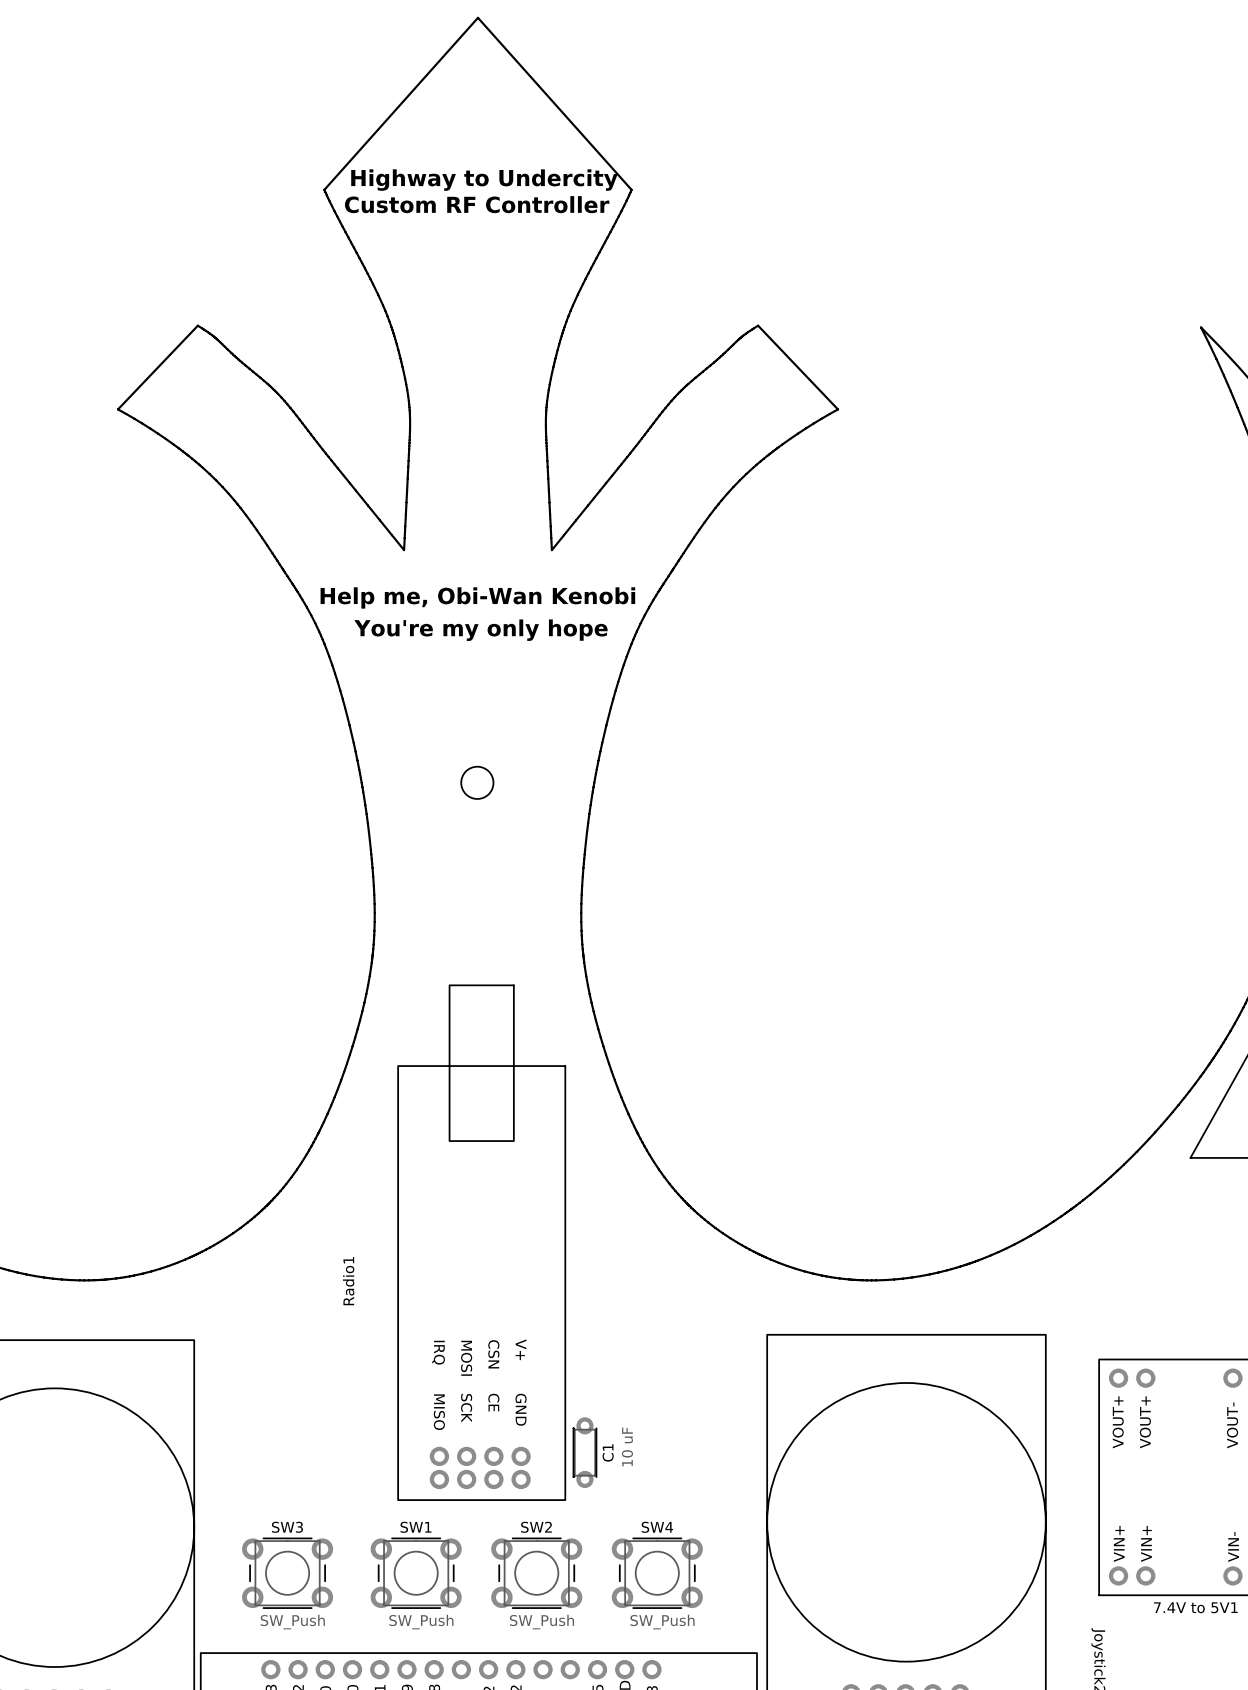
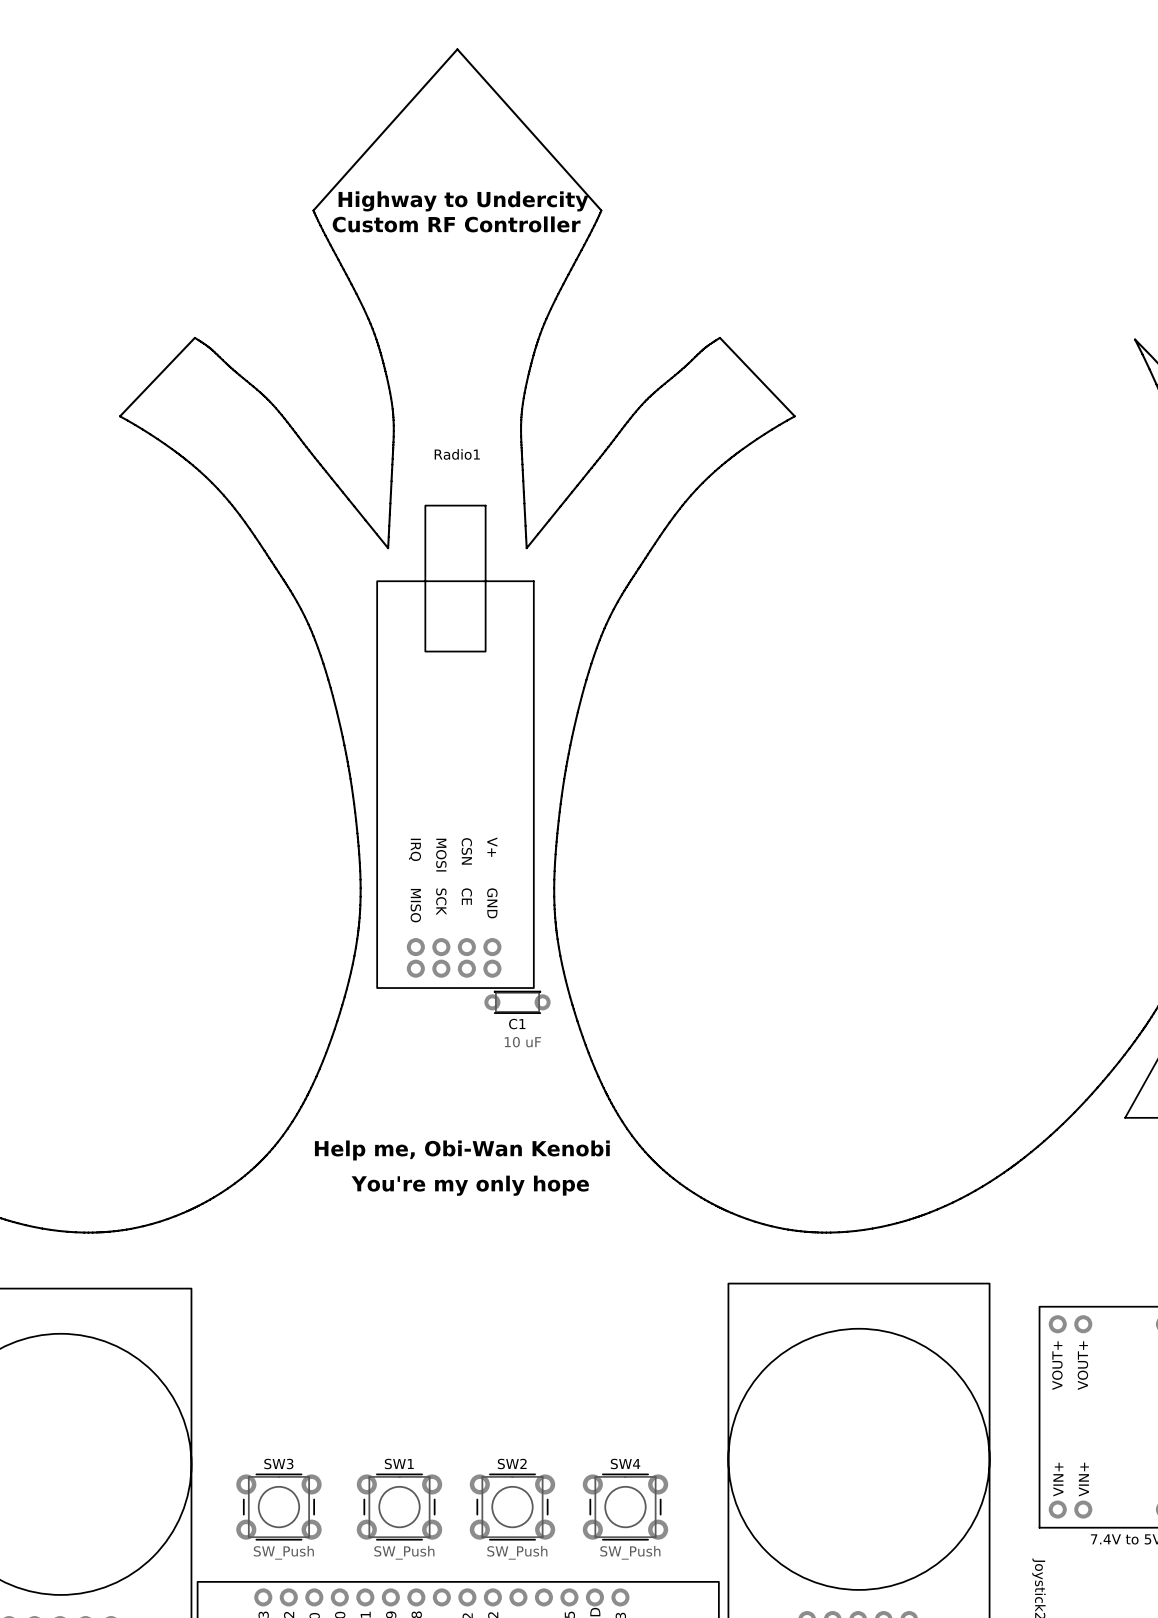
text: Help me, Obi-Wan Kenobi (477, 597) -> none
text: You're my only hope (480, 630) -> none
round board edge: [460, 766, 494, 800] -> none
text: none -> Help me, Obi-Wan Kenobi (462, 1150)
text: none -> You're my only hope (470, 1185)
Radio1 position: (481, 1242) -> (455, 746)
Radio1 name rotation: 0° (348, 1281) -> 90° clockwise (457, 454)
Radio1 name position: Radio1 (348, 1281) -> Radio1 (457, 454)
C1 rotation: 0° (584, 1452) -> 90° clockwise (517, 1002)
C1 position: (584, 1452) -> (517, 1002)

